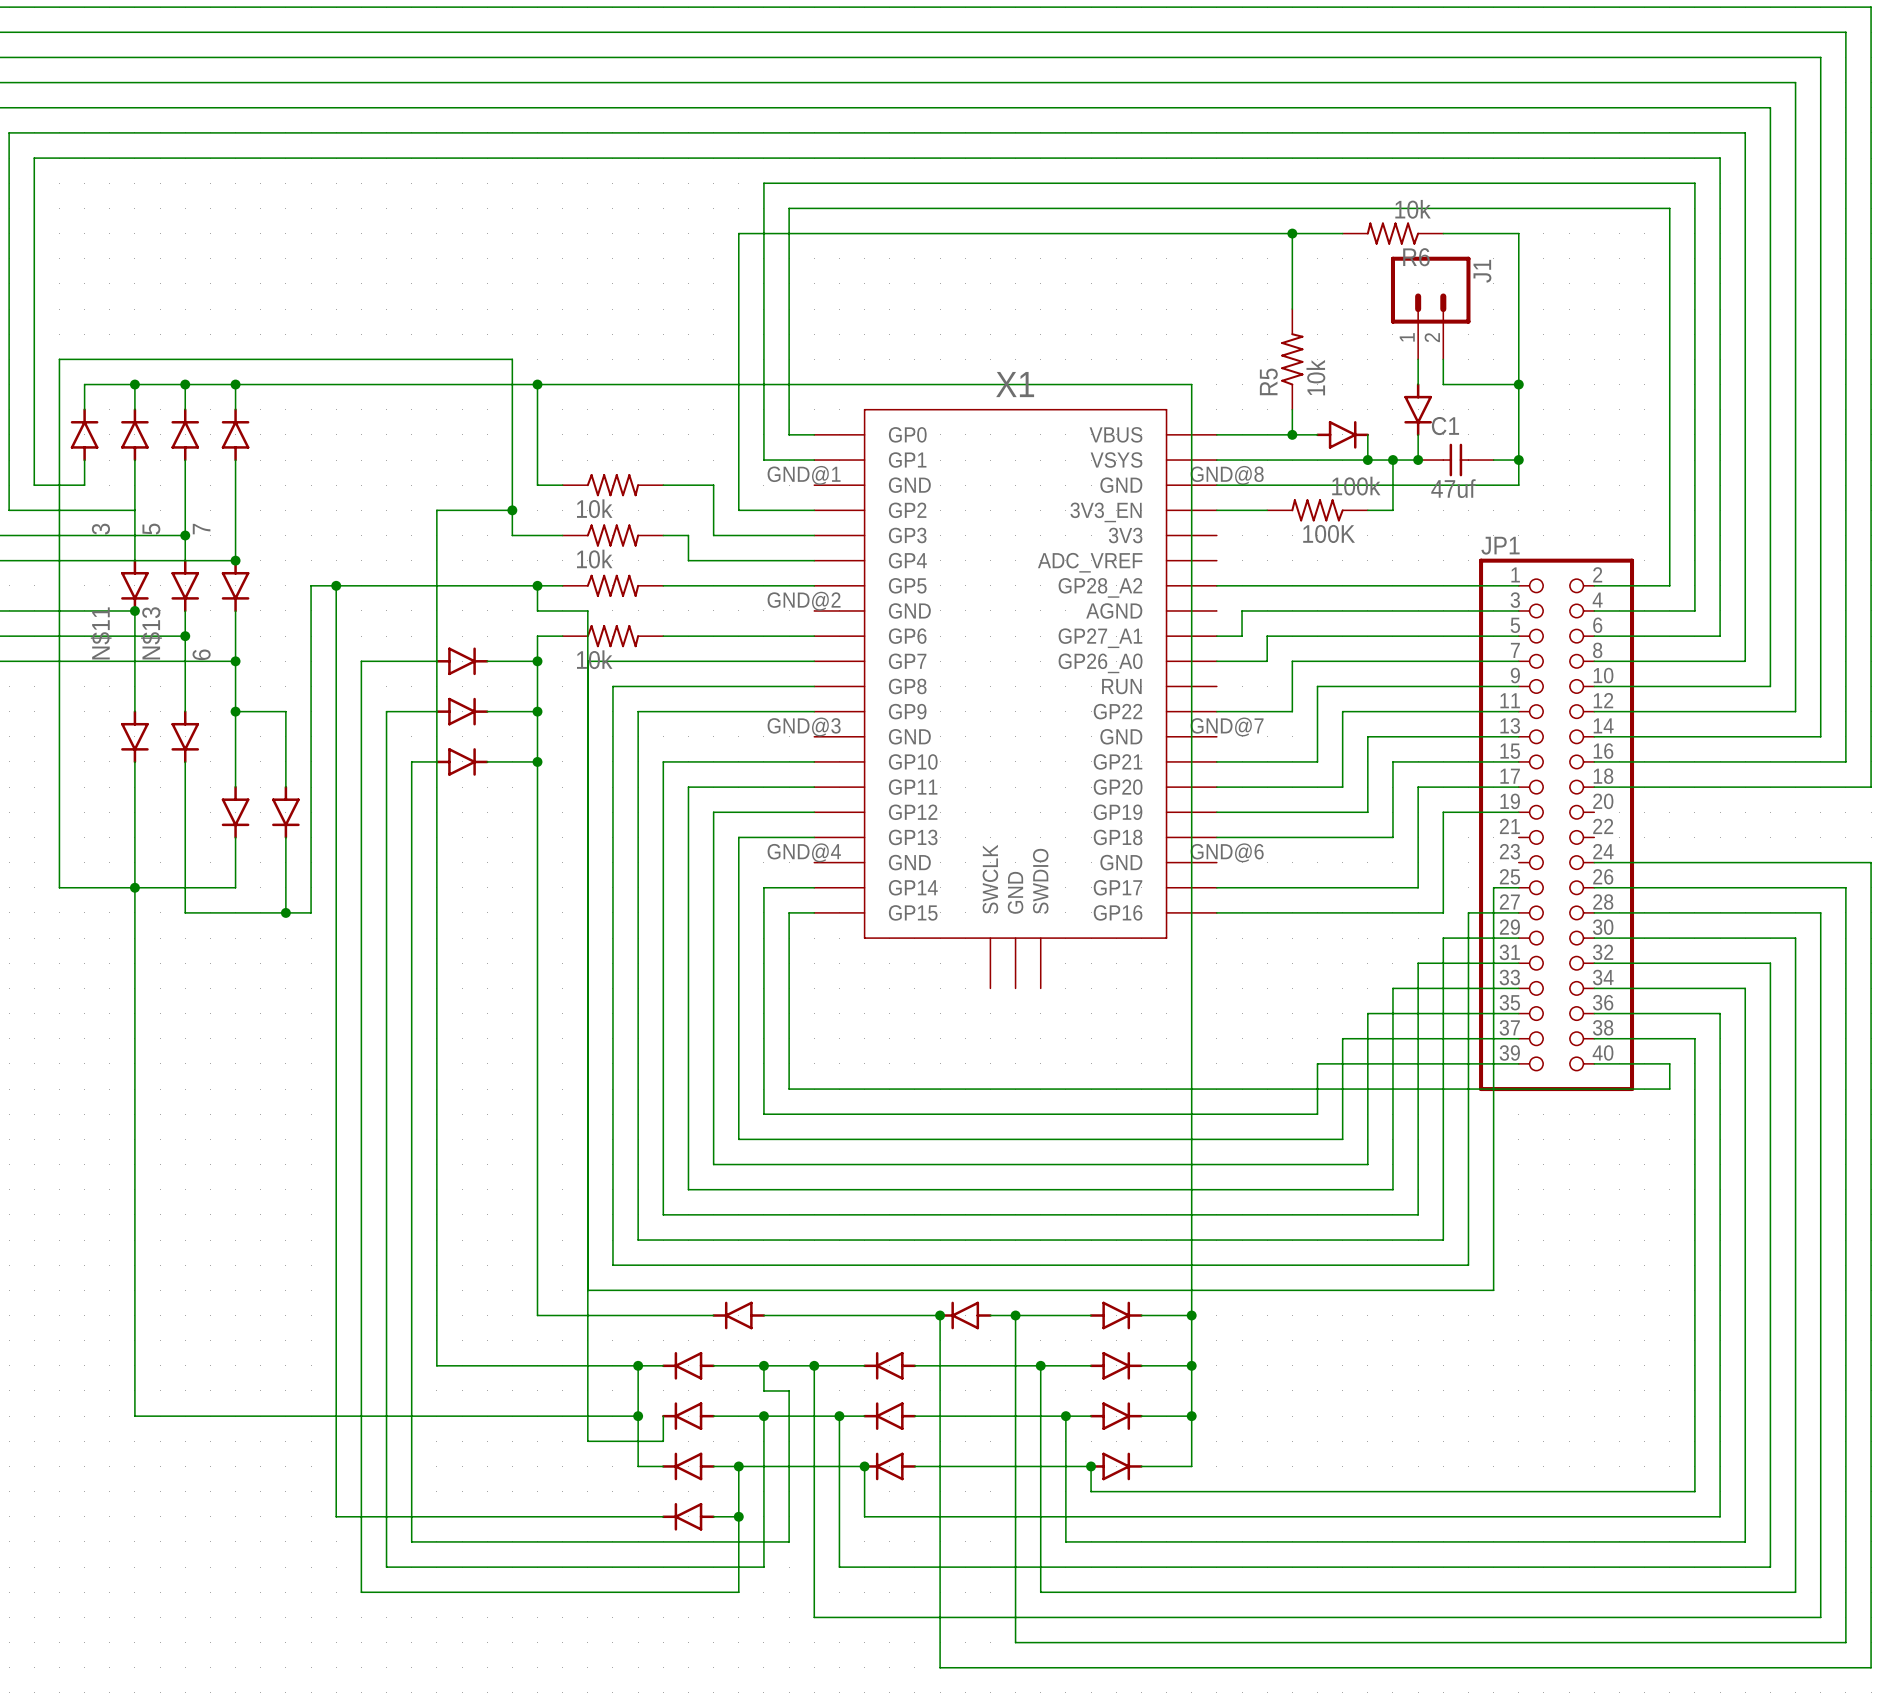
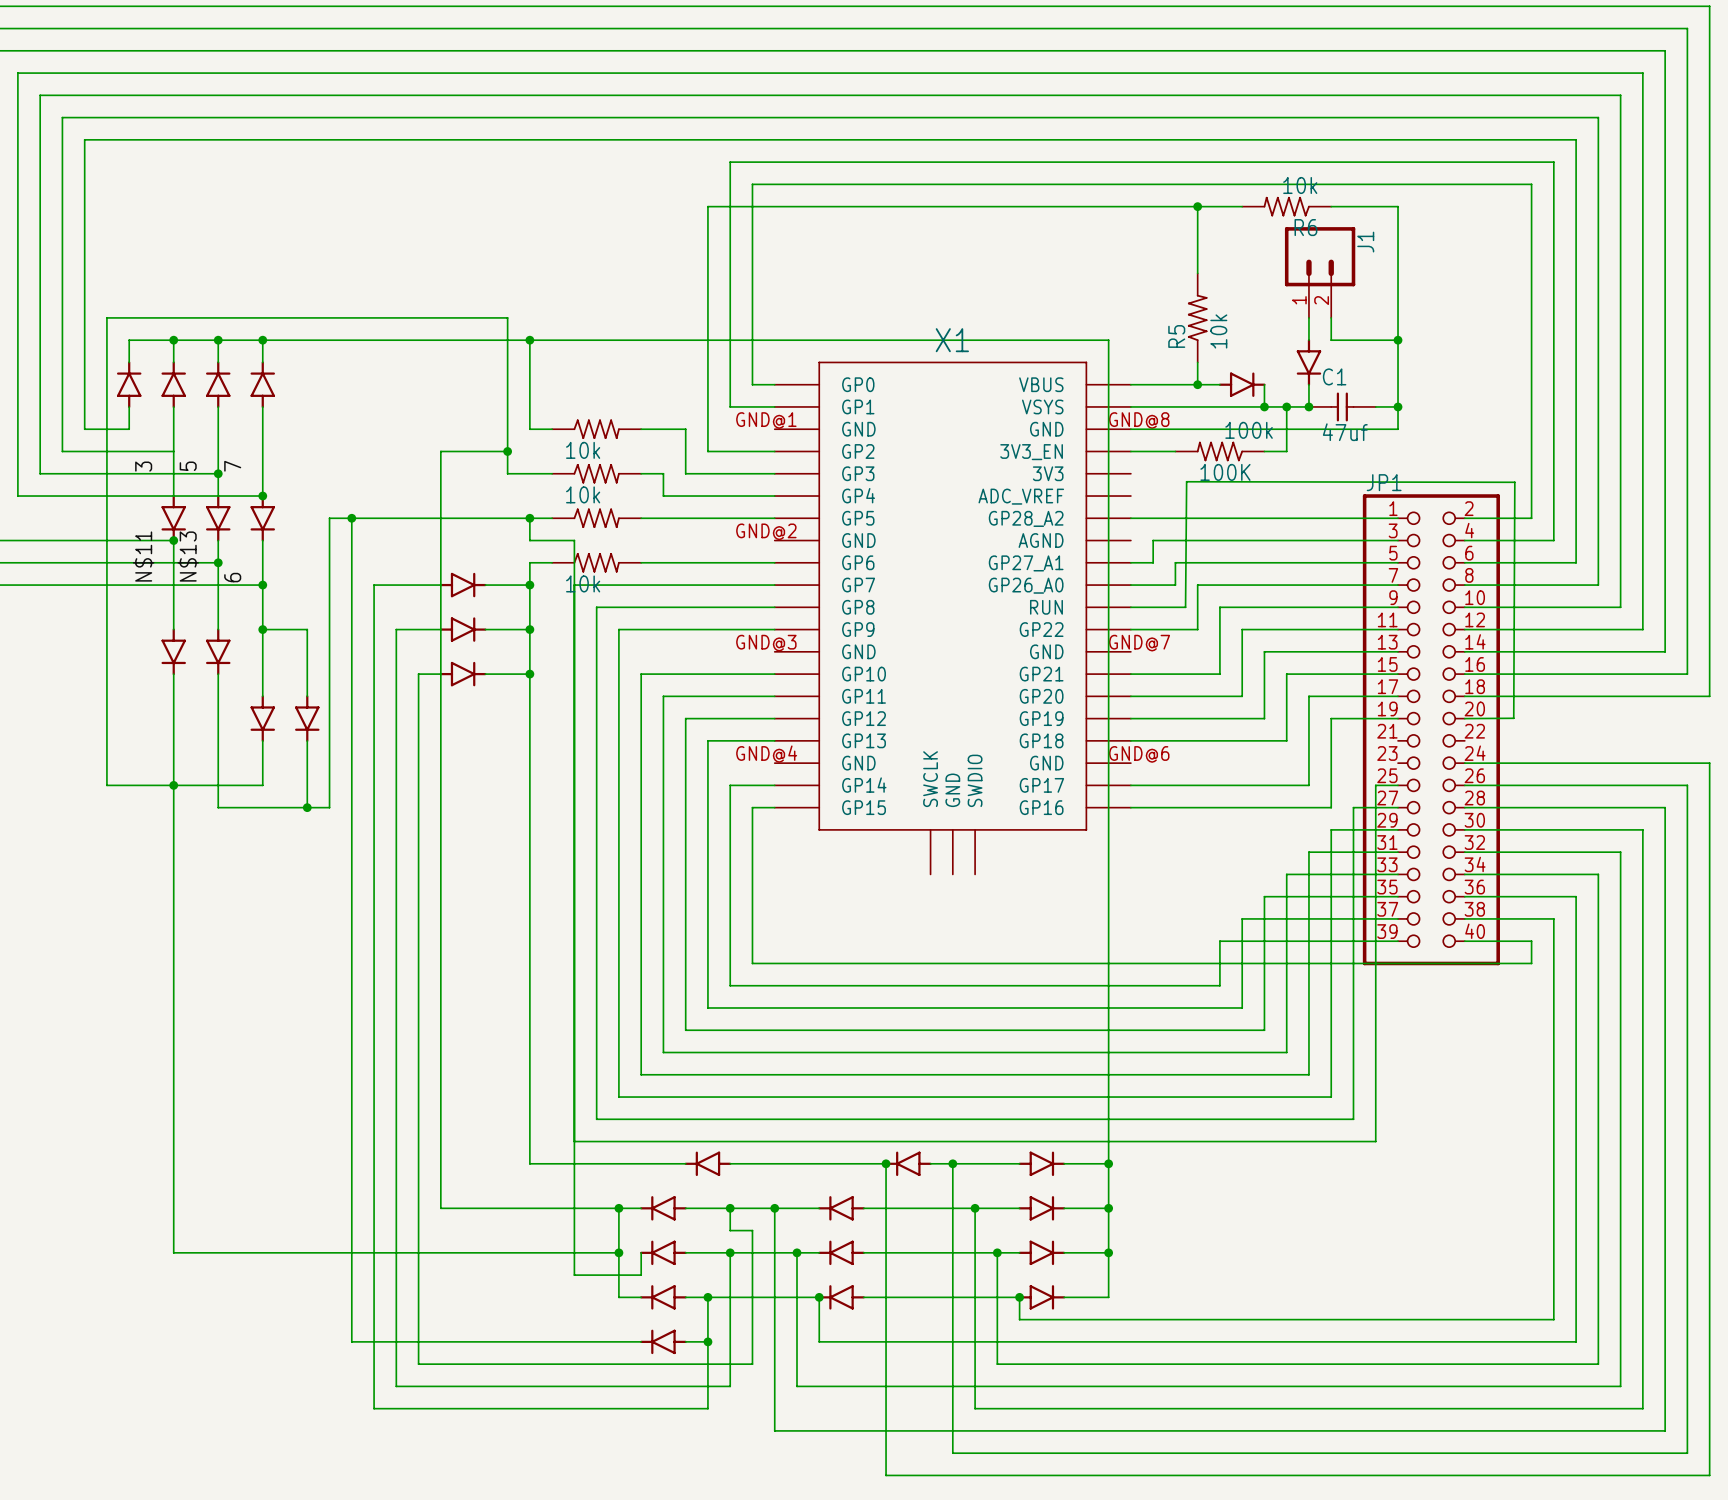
wire: none -> (1130, 607) (1185, 607) (1186, 481) (1514, 482) (1513, 718) (1464, 718)

